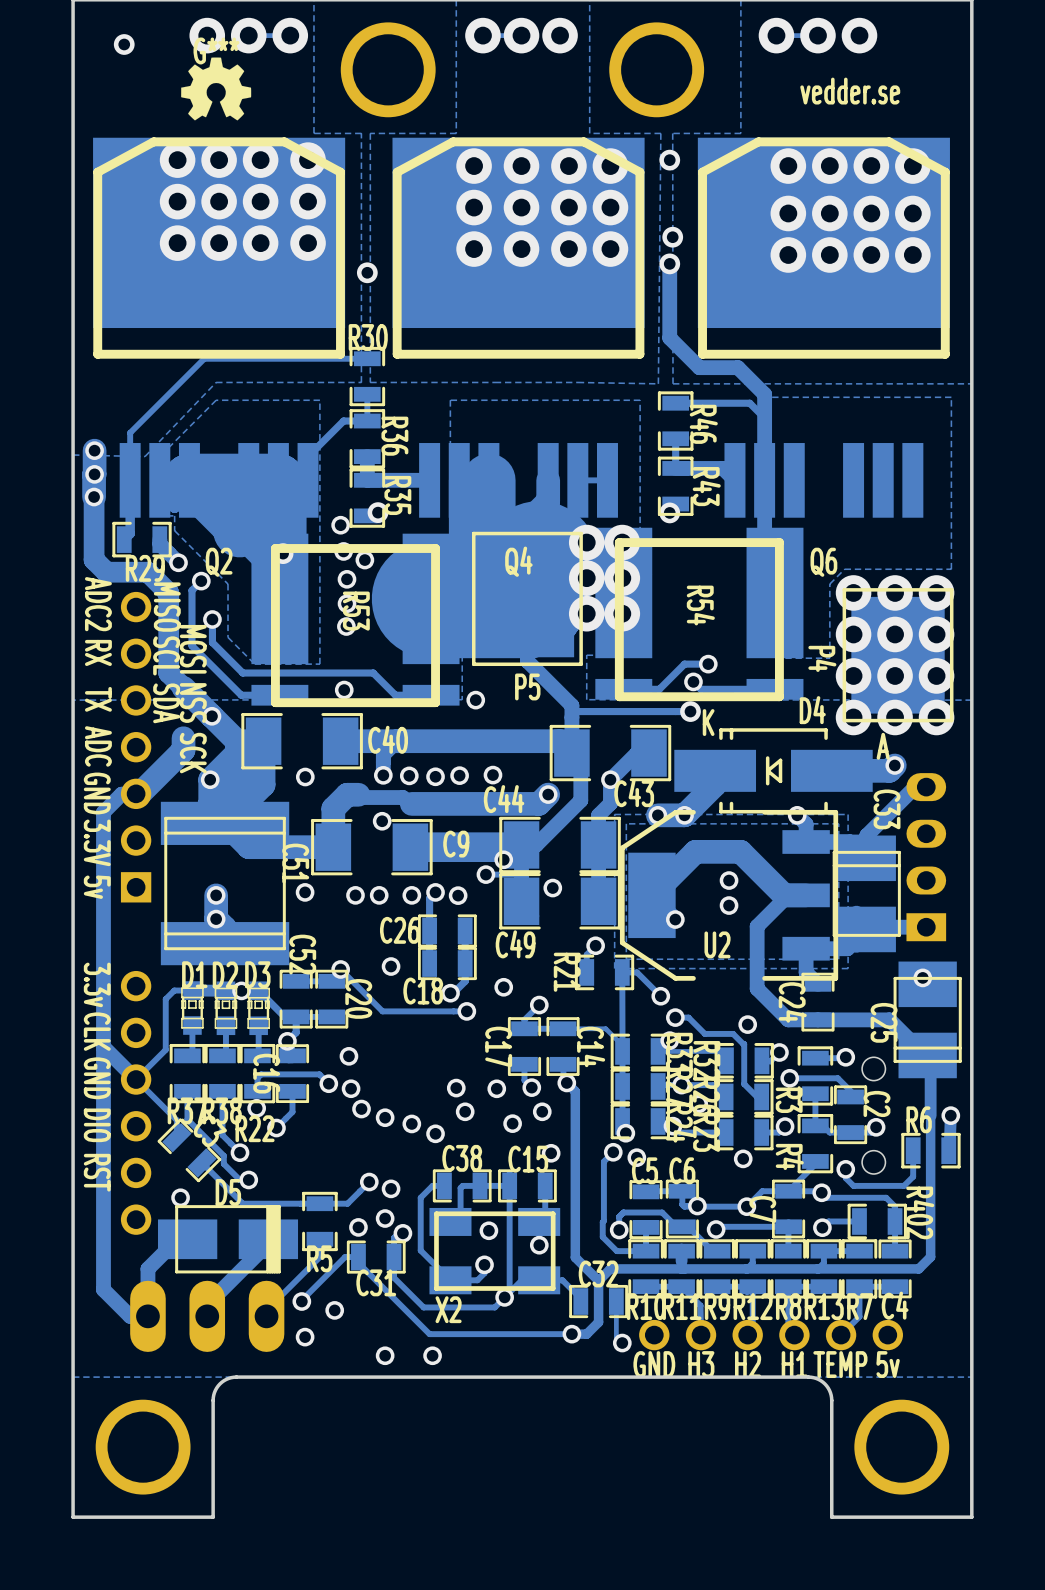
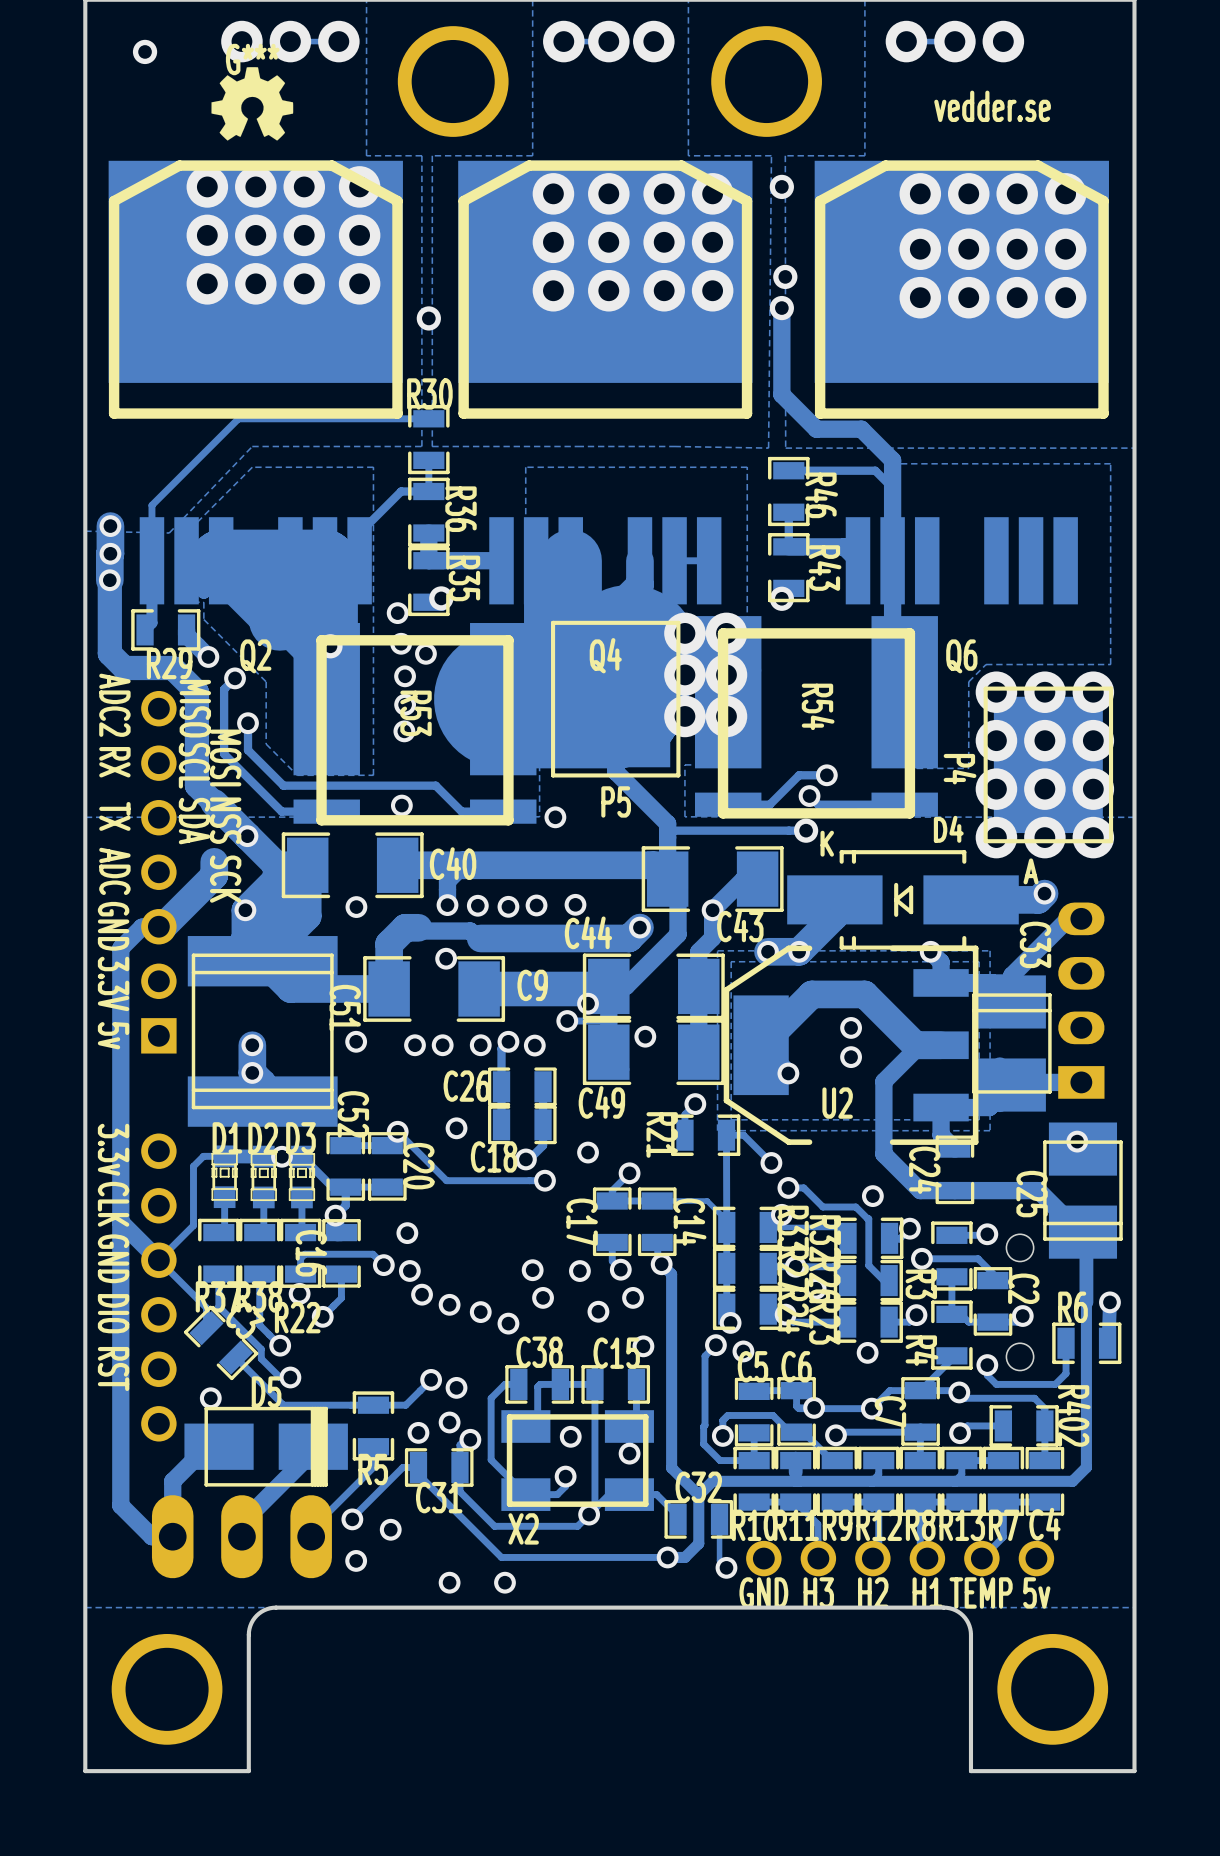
D4 footprint: [674, 728, 873, 814] -> [787, 850, 1019, 950]

